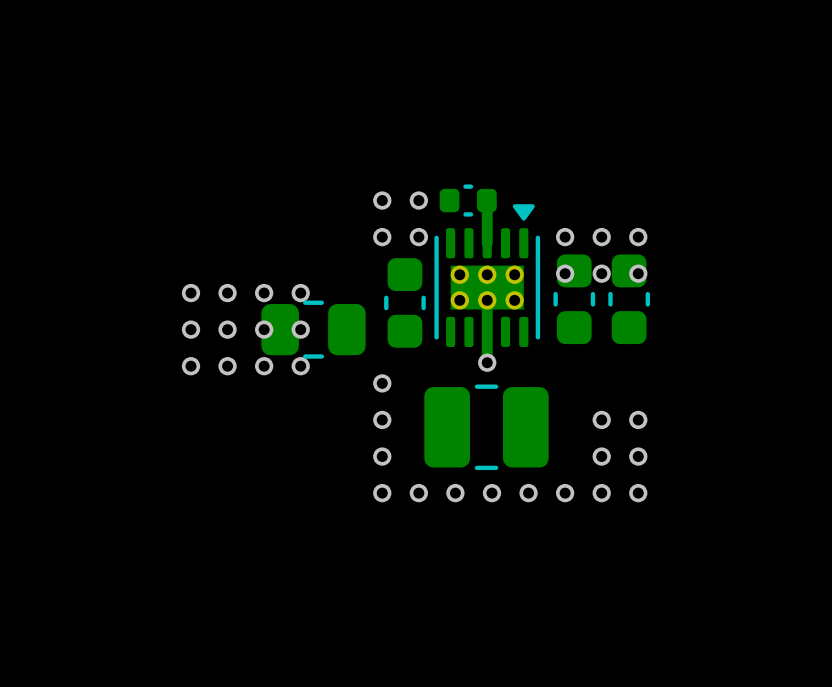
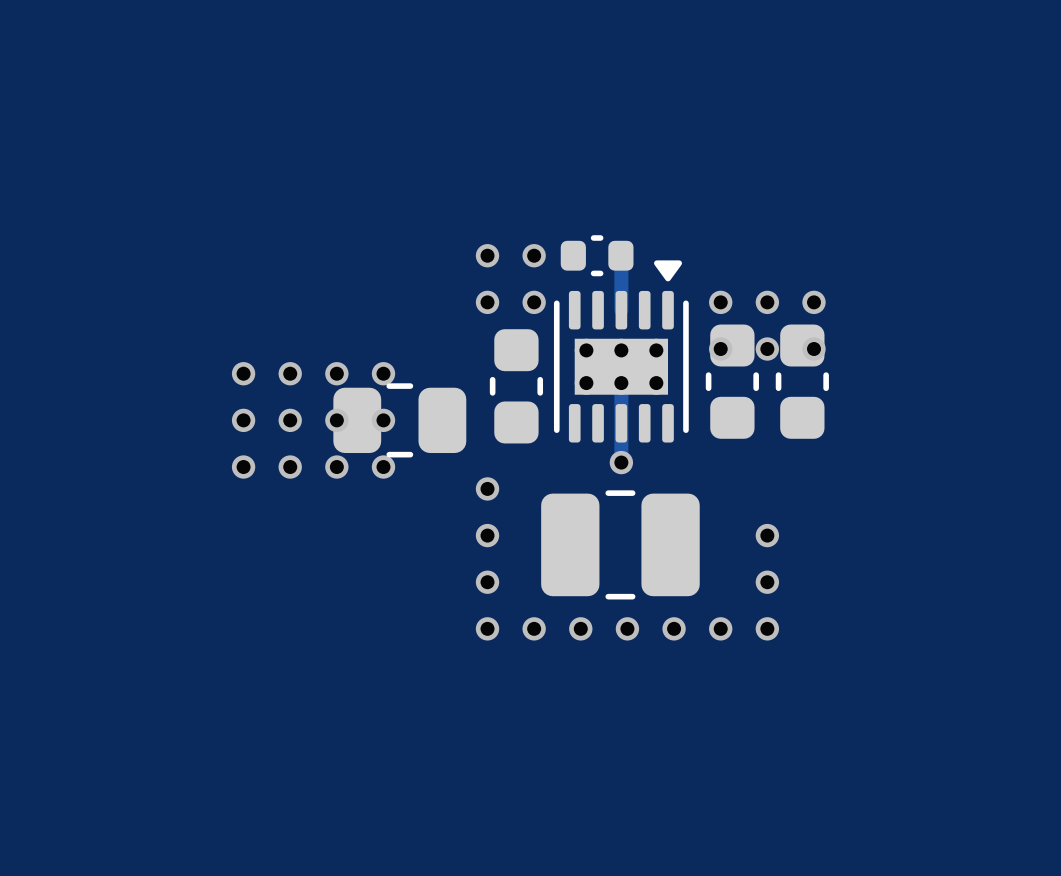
via: (638, 419) -> none
via: (638, 456) -> none
via: (638, 493) -> none

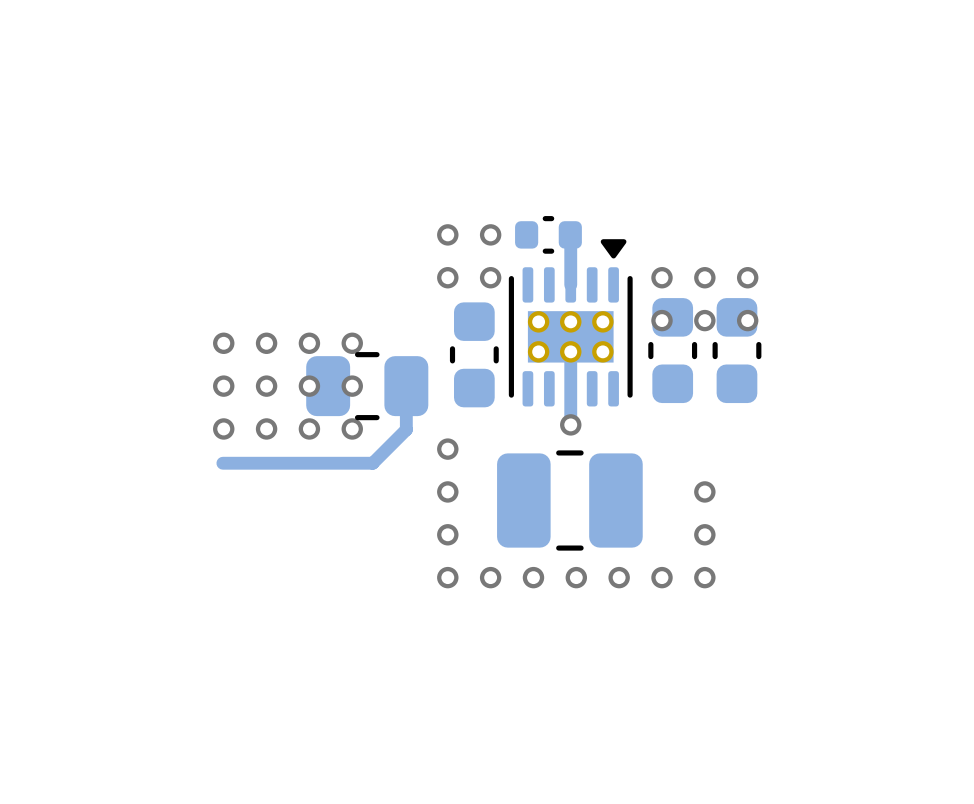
track: none -> (406, 386) (406, 429) (372, 463) (222, 463)

